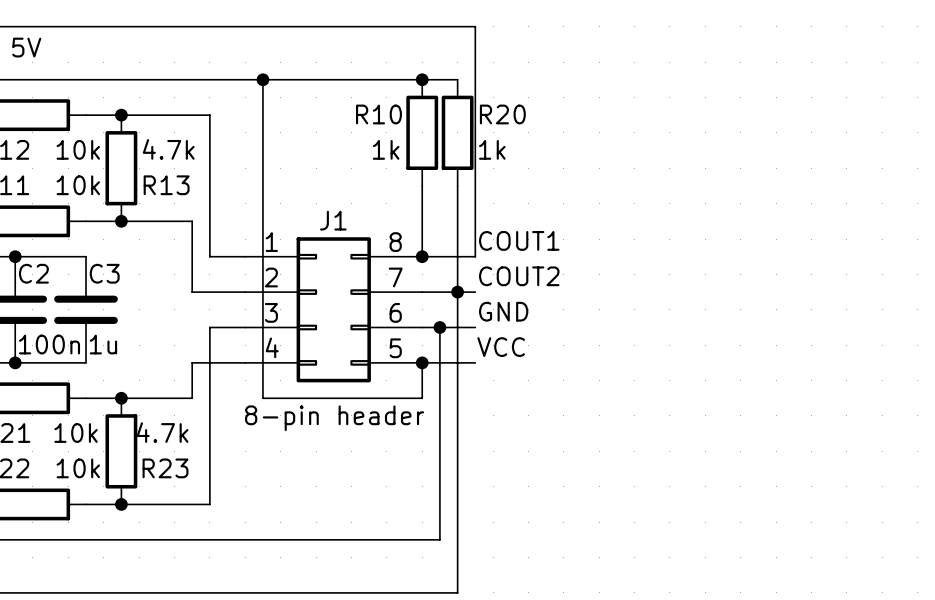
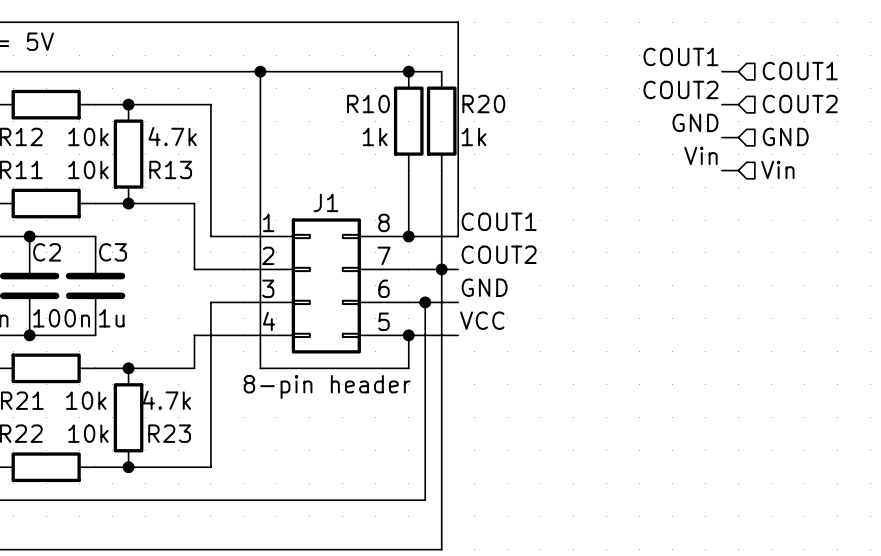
label: none -> COUT1 (680, 56)
wire: none -> (721, 71) (738, 71)
hierarchical label: none -> COUT1 (800, 71)
label: none -> COUT2 (680, 89)
hierarchical label: none -> COUT2 (800, 104)
wire: none -> (721, 104) (738, 104)
label: none -> GND (695, 122)
hierarchical label: none -> GND (785, 136)
wire: none -> (721, 137) (738, 137)
label: none -> Vin (700, 155)
wire: none -> (721, 170) (738, 170)
hierarchical label: none -> Vin (777, 169)

